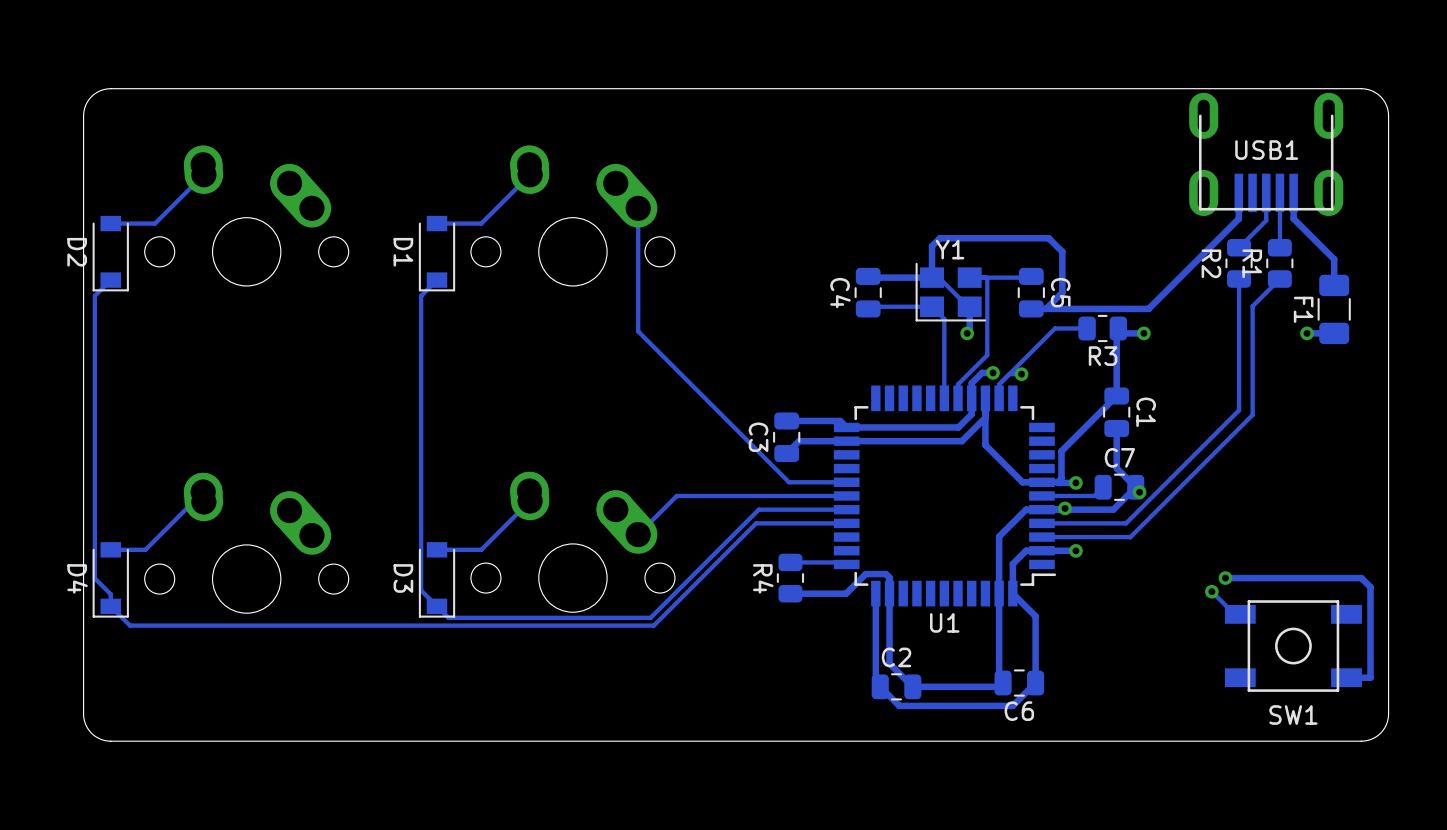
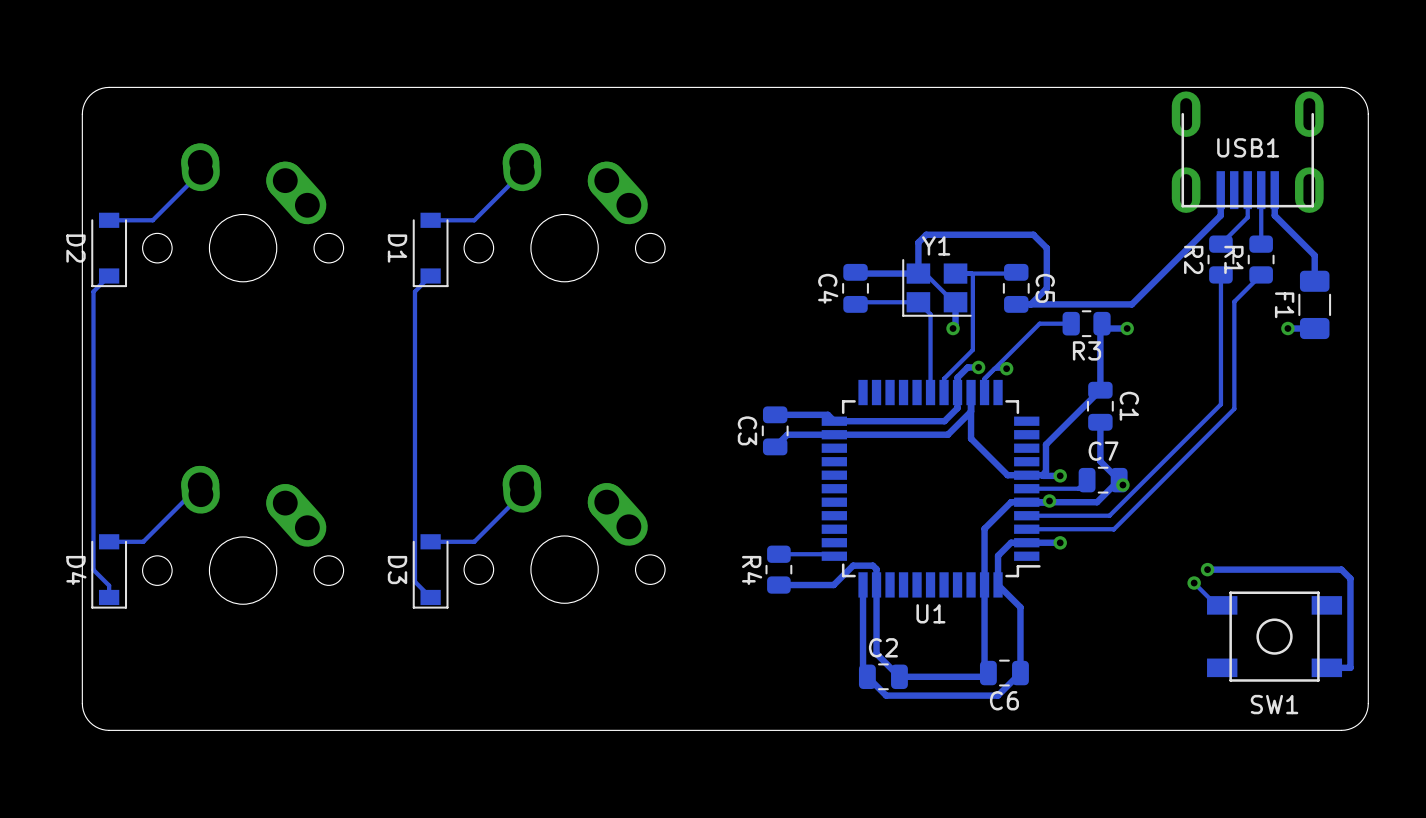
track: (638, 208) (638, 331) (789, 482) (846, 482) -> none
track: (846, 495) (676, 495) (638, 534) -> none
track: (846, 509) (758, 509) (650, 617) (448, 617) (437, 606) -> none
track: (846, 523) (756, 523) (653, 625) (130, 625) (110, 606) -> none

